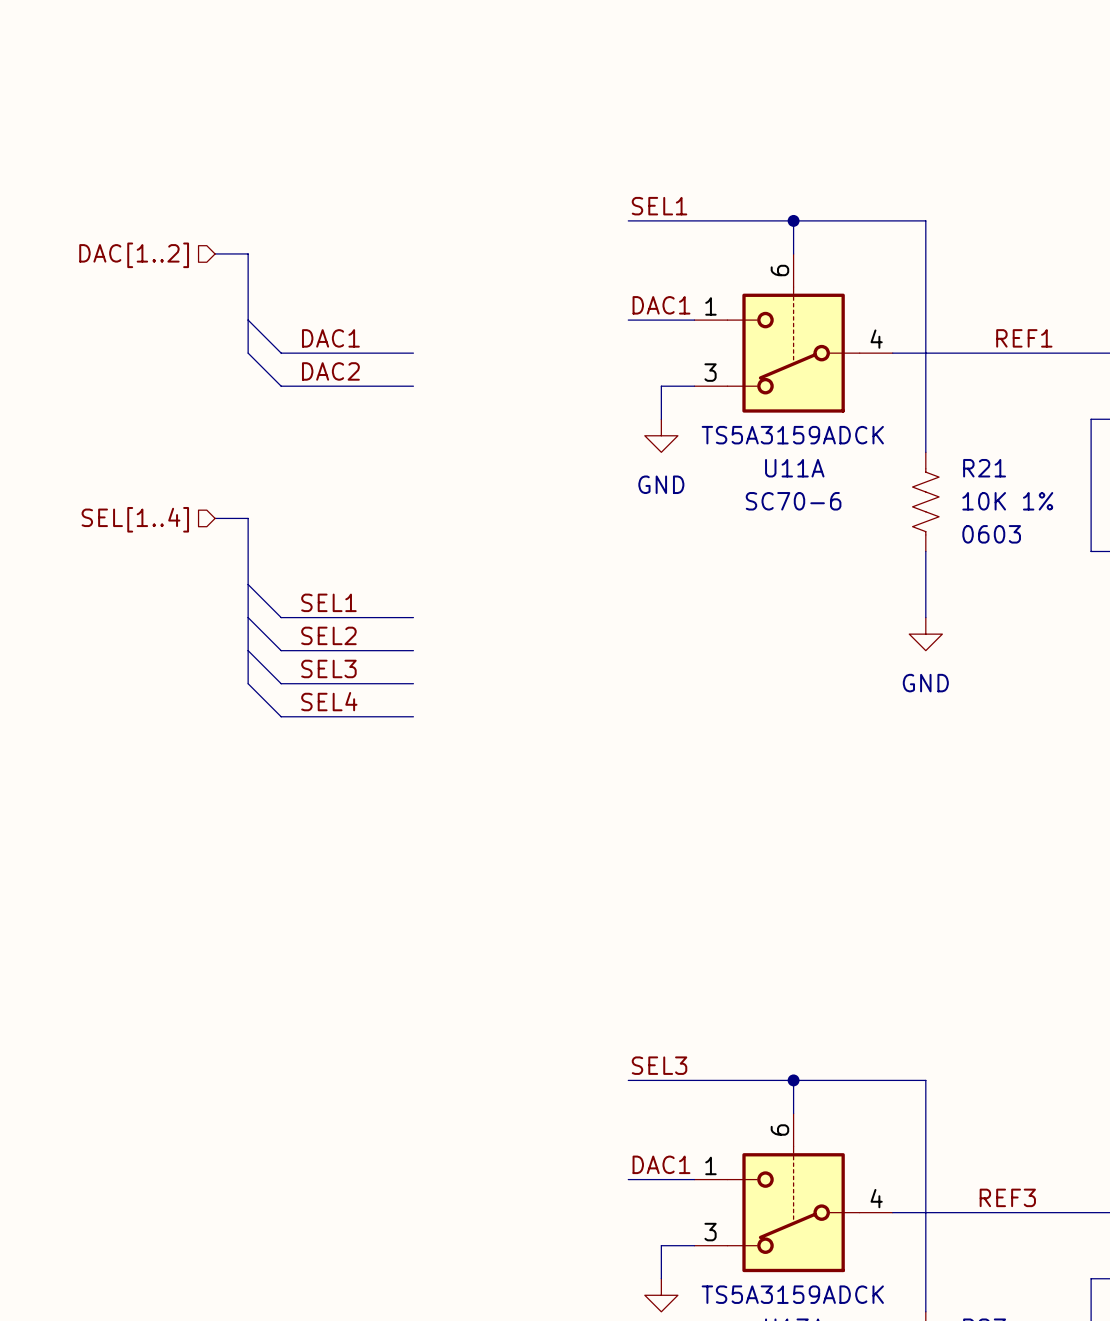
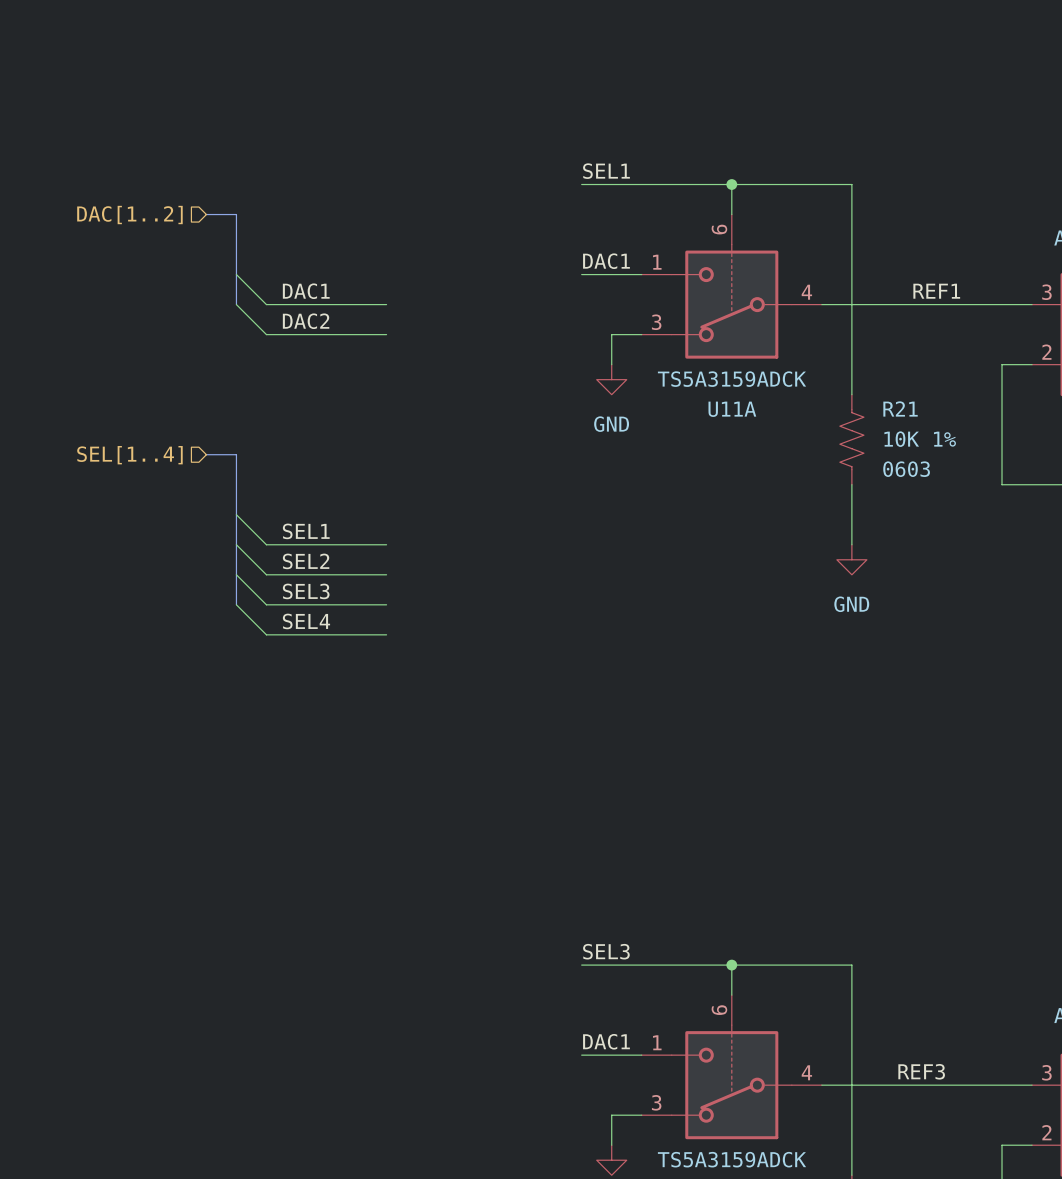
U11A text: SC70-6 (793, 501) -> none

